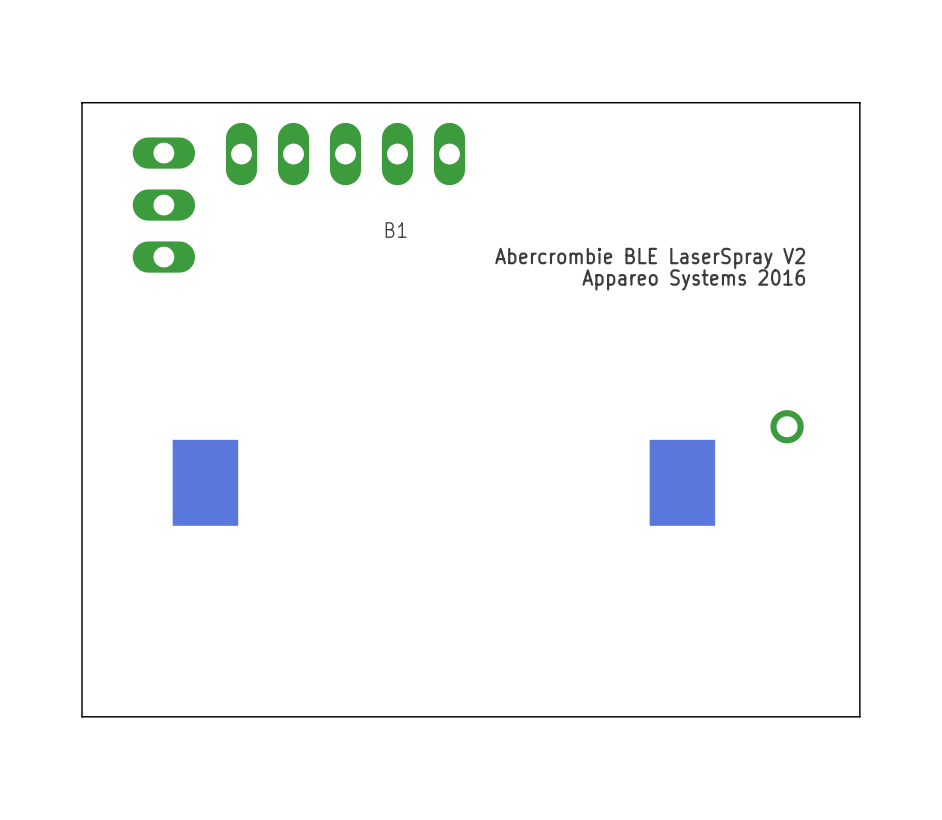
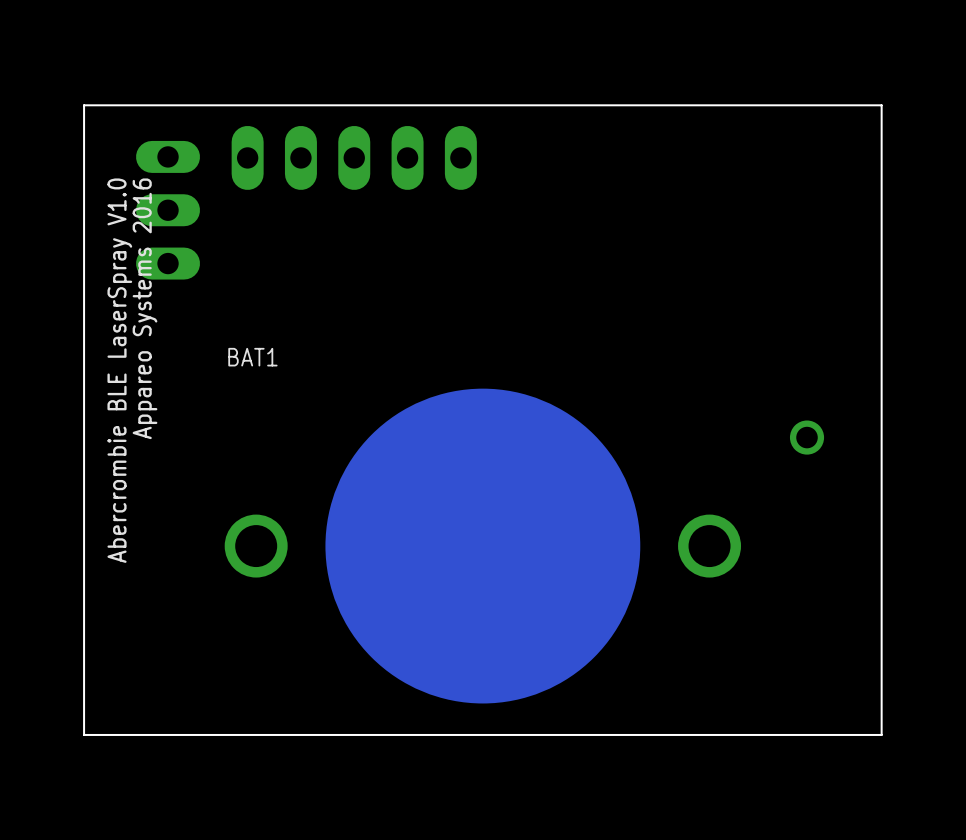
text: Abercrombie BLE LaserSpray V2 (650, 258) -> none
text: Appareo Systems 2016 (693, 279) -> none
text: none -> Appareo Systems 2016 (145, 308)
text: none -> Abercrombie BLE LaserSpray V1.0 (119, 370)
B1: (443, 482) -> none
BAT1: none -> (482, 546)

